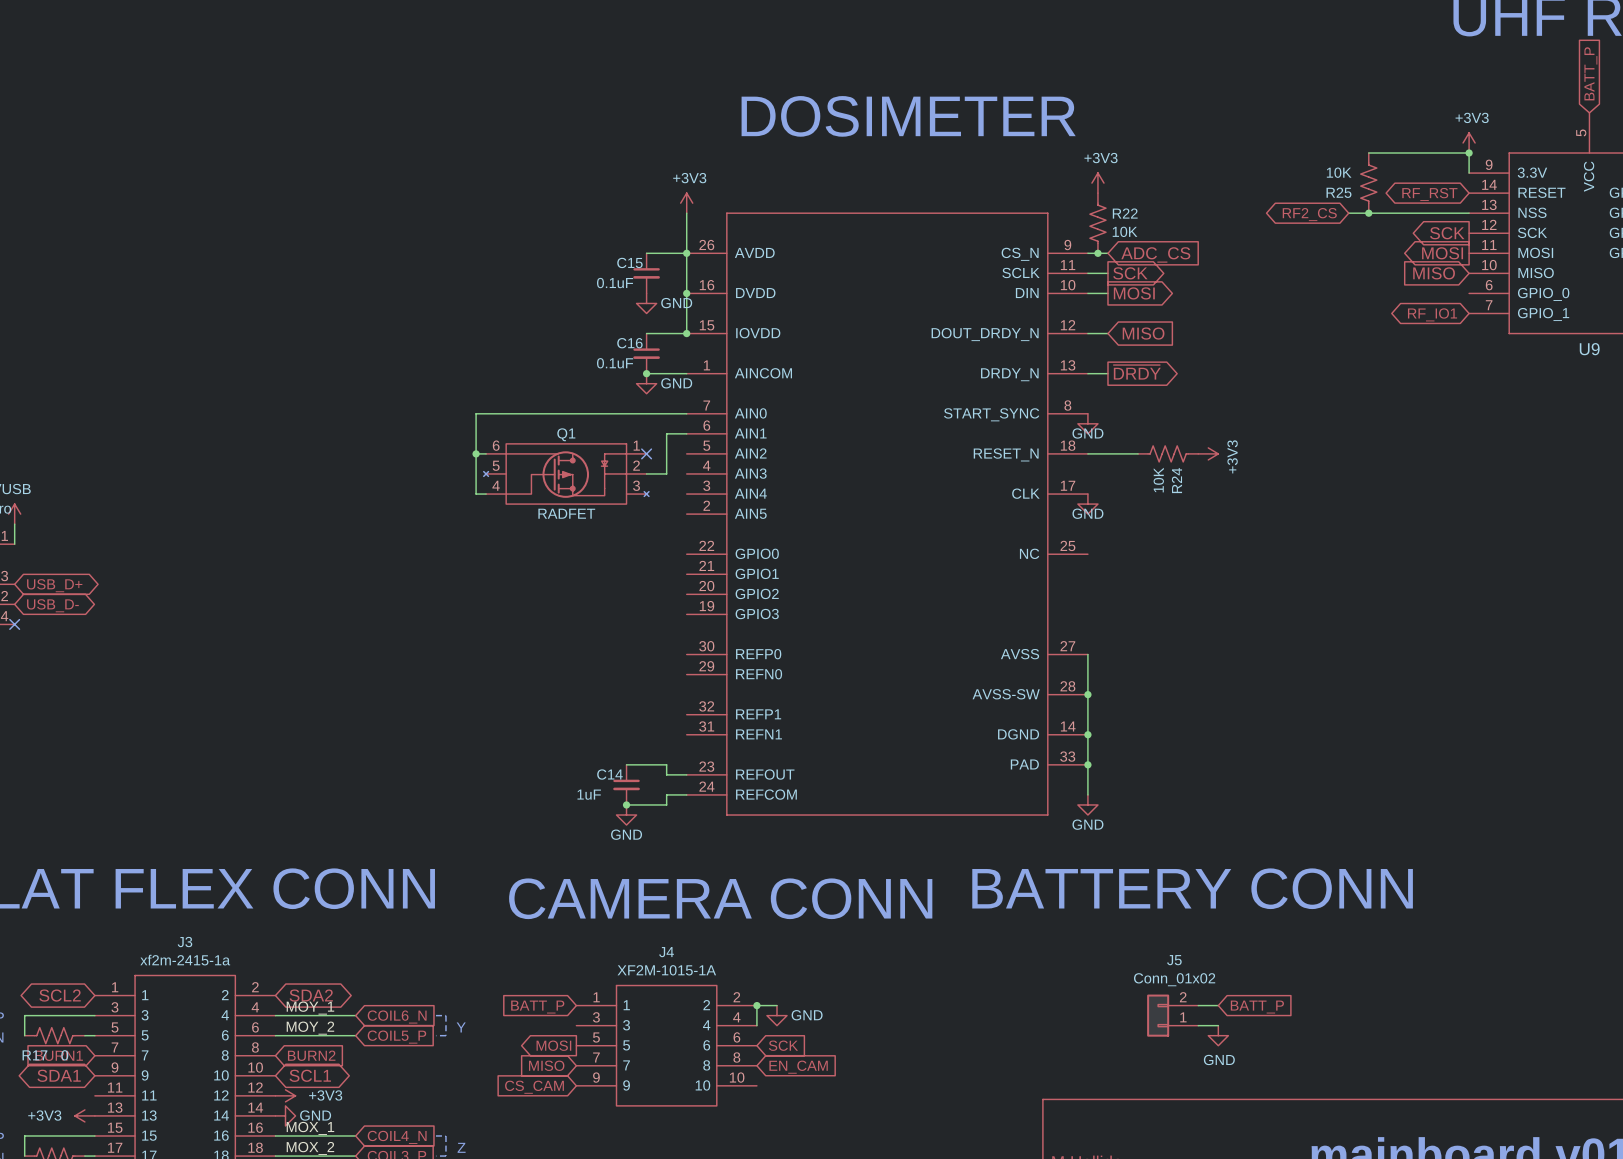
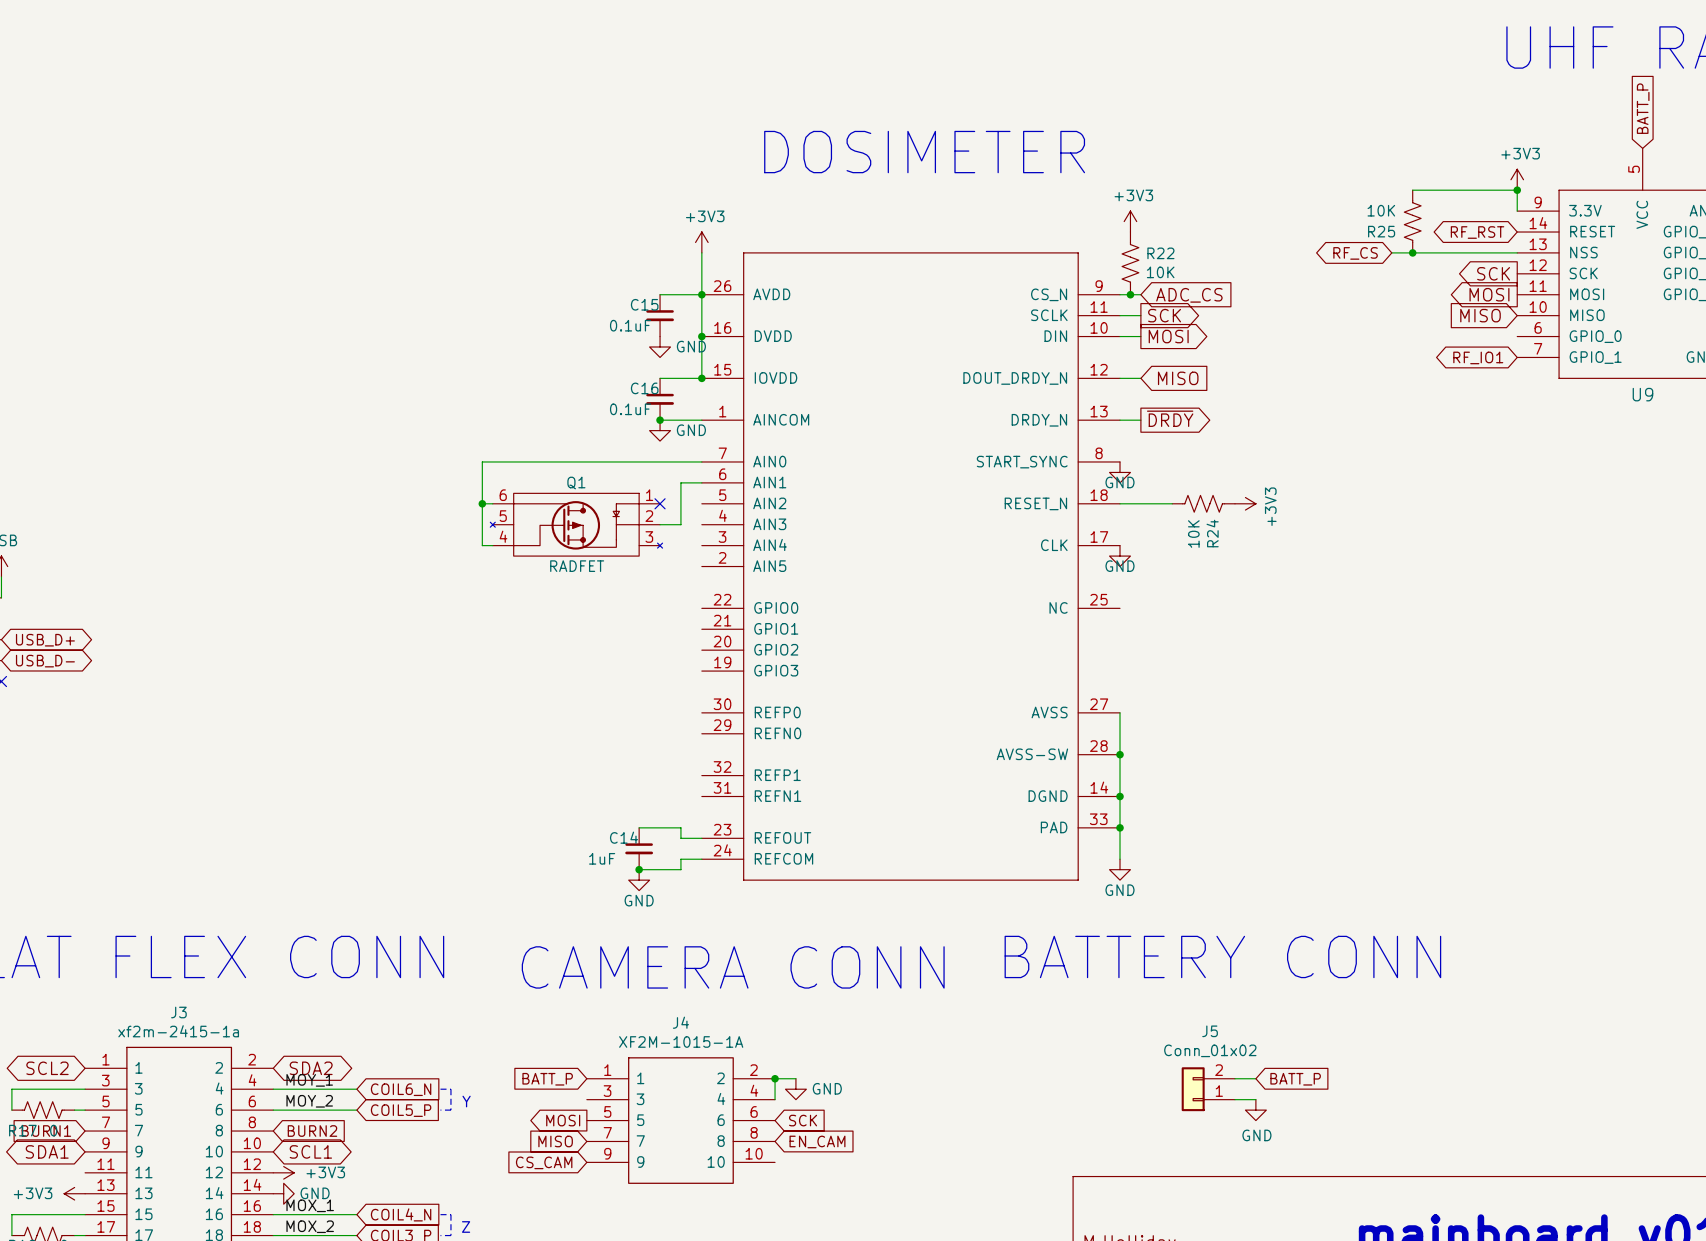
global label: RF2_CS (1309, 214) -> RF_CS (1355, 253)

